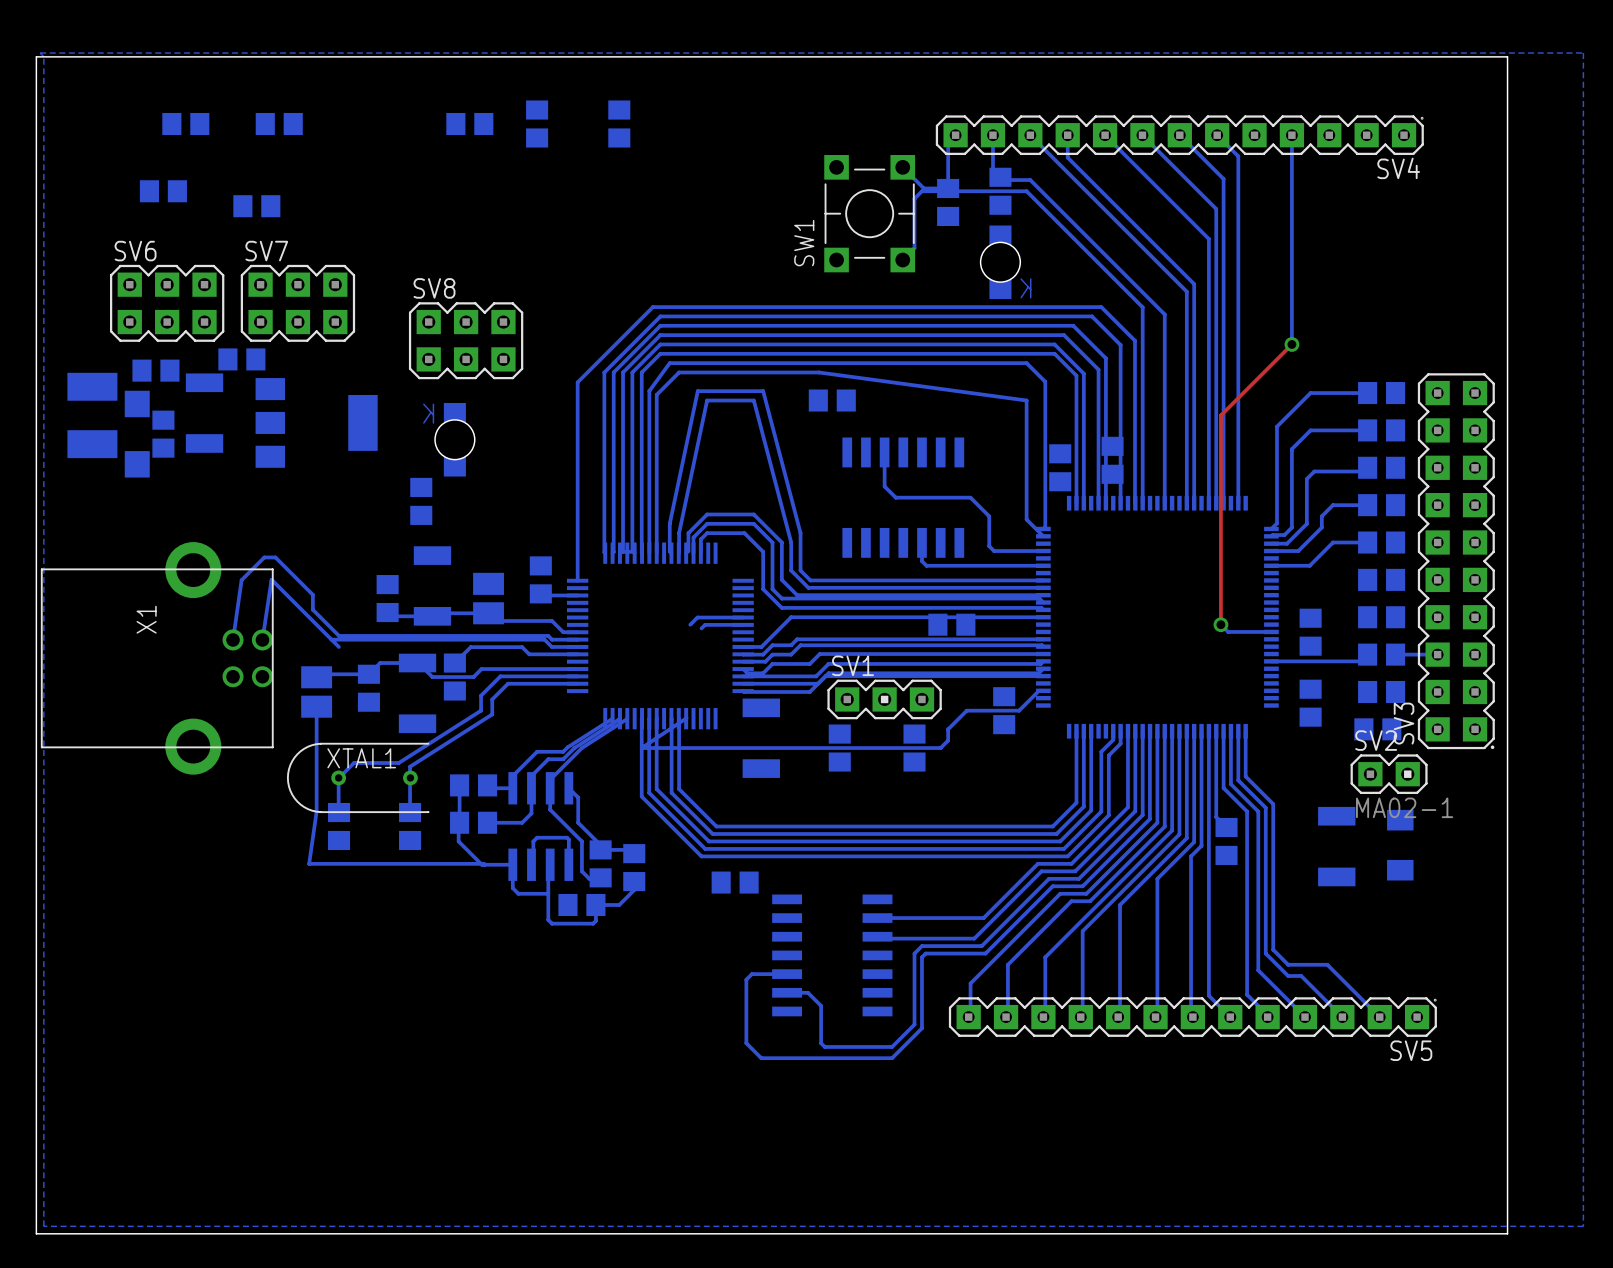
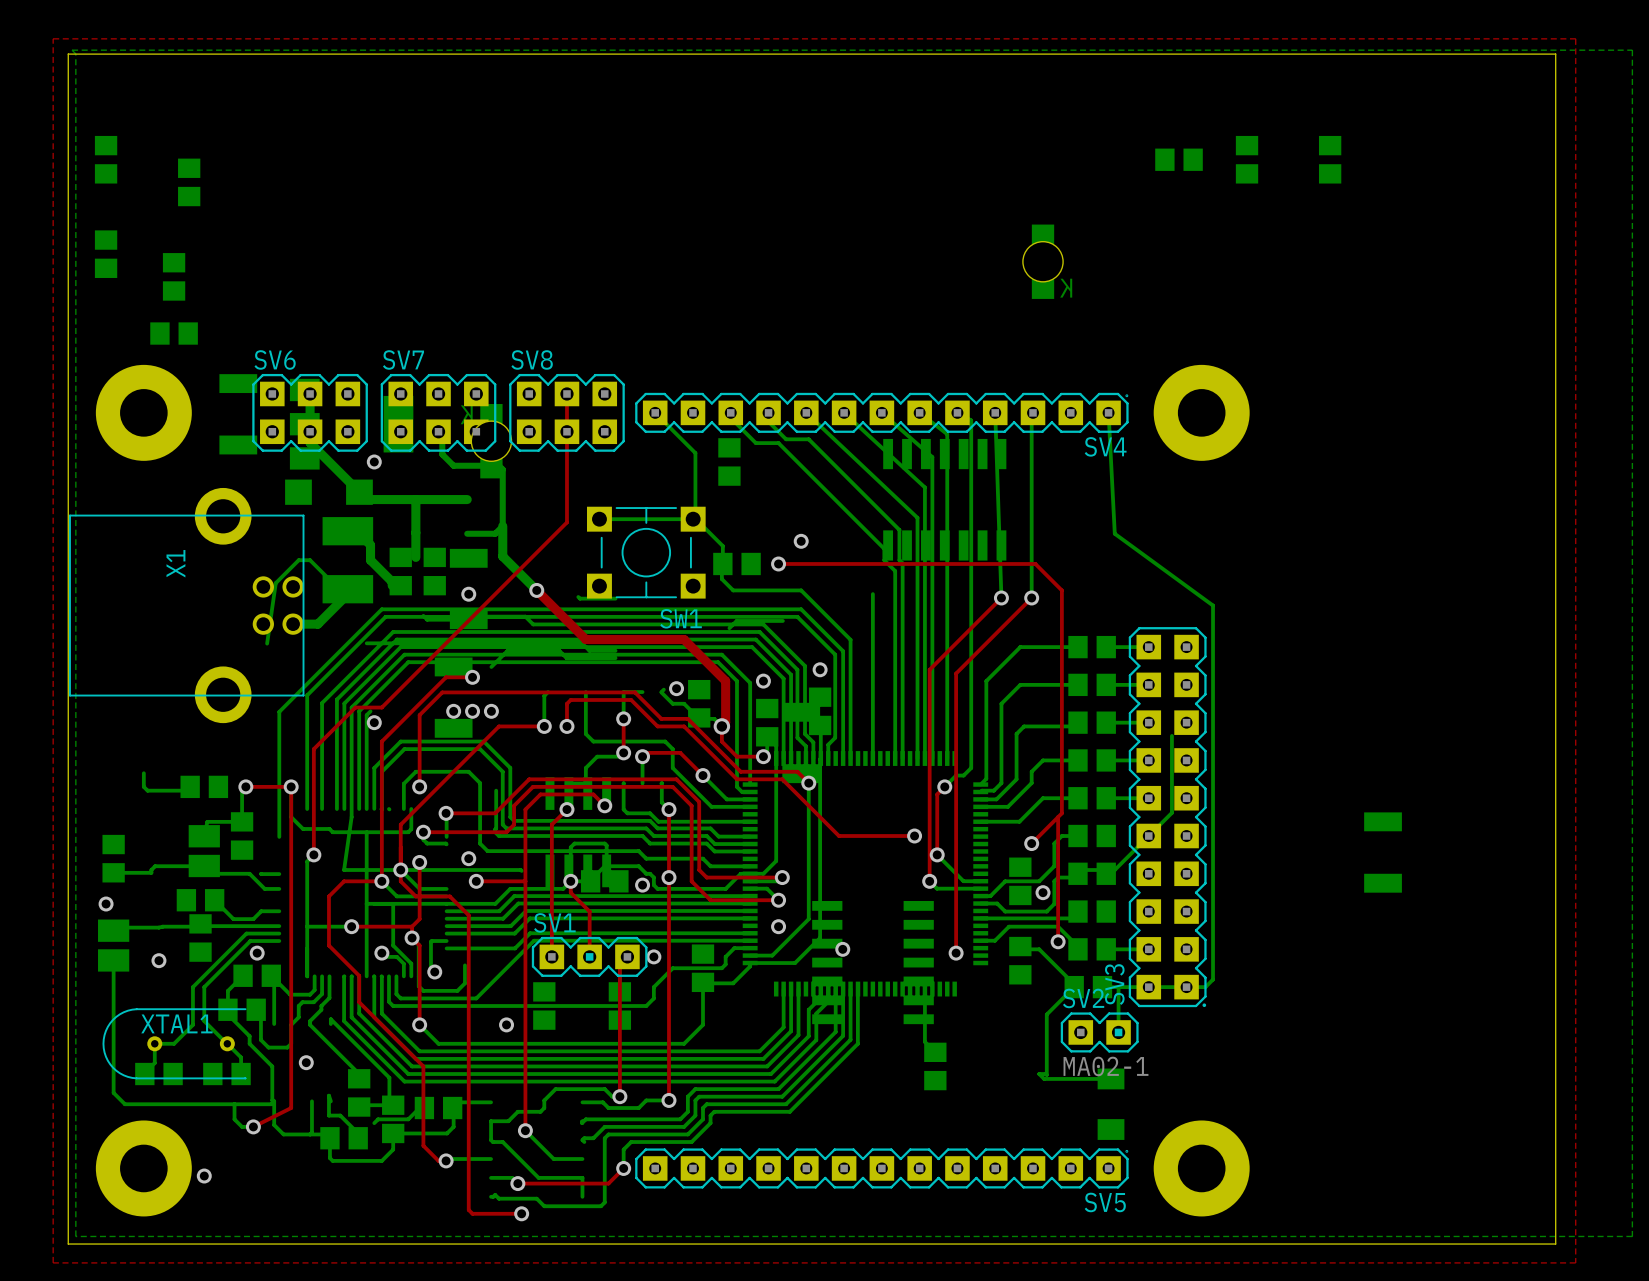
top zone outline: none -> (53, 38) (1575, 38) (1575, 1262) (53, 1262) (53, 38)
part: (185, 123) -> none
part: (279, 123) -> none
part: (469, 123) -> none
part: (537, 123) -> none
part: (619, 123) -> none
bottom track: (955, 135) (948, 142) (948, 188) -> none
bottom track: (992, 135) (992, 169) (1003, 180) (1030, 180) (1164, 314) (1164, 503) -> none
bottom track: (1030, 135) (1186, 291) (1186, 503) -> none
bottom track: (1067, 135) (1067, 157) (1194, 284) (1194, 503) -> none
bottom track: (1105, 135) (1208, 239) (1208, 503) -> none
bottom track: (1142, 135) (1216, 209) (1216, 503) -> none
bottom track: (1179, 135) (1223, 178) (1223, 503) -> none
SV4 position: (1179, 135) -> (881, 412)
bottom track: (1217, 135) (1238, 156) (1238, 503) -> none
bottom track: (1291, 135) (1291, 344) -> none
part: none -> (106, 159)
part: none -> (1179, 159)
part: none -> (1247, 159)
part: none -> (1330, 159)
bottom track: (902, 167) (923, 188) (948, 188) -> none
part rotation: 0° (163, 191) -> 90° clockwise (189, 182)
part: (1000, 191) -> none
part: (948, 202) -> none
part: (256, 206) -> none
SW1 rotation: 0° (869, 213) -> 90° clockwise (646, 552)
SW1 position: (869, 213) -> (646, 552)
SW1 name position: SW1 (804, 243) -> SW1 (681, 618)
part: none -> (106, 254)
bottom track: (902, 260) (914, 248) (914, 198) (921, 191) (1026, 191) (1142, 307) (1142, 503) -> none
part: none -> (174, 276)
SV6 position: (167, 303) -> (310, 412)
SV7 position: (297, 303) -> (438, 412)
SV8 position: (466, 340) -> (566, 412)
top track: (1291, 344) (1220, 415) (1220, 624) -> none
via: (1291, 344) -> none
part: (241, 359) -> none
part position: (155, 370) -> (174, 333)
bottom track: none -> (310, 393) (310, 442) (359, 492)
top track: none -> (566, 393) (566, 522) (381, 707) (355, 707) (313, 749) (313, 854)
bottom track: (1367, 393) (1310, 393) (1276, 426) (1276, 523) (1271, 528) -> none
part: (1381, 393) -> none
part: (832, 400) -> none
part: none -> (143, 412)
bottom track: none -> (730, 412) (730, 417) (755, 443) (778, 443) (884, 548) (884, 560) (895, 571) (895, 758)
bottom track: none -> (768, 412) (768, 421) (786, 439) (808, 439) (899, 529) (899, 560) (903, 563)
bottom track: none -> (806, 412) (917, 517) (917, 758)
bottom track: none -> (844, 412) (924, 487) (924, 758)
bottom track: none -> (881, 412) (932, 457) (932, 758)
bottom track: none -> (919, 412) (947, 434) (947, 758)
bottom track: none -> (957, 412) (971, 420) (971, 768) (963, 775) (956, 775) (944, 786)
bottom track: none -> (995, 412) (1001, 597)
bottom track: none -> (1108, 412) (1114, 533) (1213, 605) (1213, 979) (1205, 987) (1102, 987)
part: none -> (1201, 412)
part position: (92, 415) -> (347, 560)
bottom track: none -> (653, 420) (655, 412) (695, 453) (695, 518) (722, 546) (722, 563)
bottom track: none -> (438, 431) (442, 435) (442, 454) (453, 465) (498, 465) (502, 469) (502, 526)
bottom track: (1367, 430) (1310, 430) (1291, 449) (1291, 527) (1284, 535) (1271, 536) -> none
part: (1381, 430) -> none
part rotation: 0° (137, 434) -> 90° clockwise (328, 492)
part position: (137, 434) -> (328, 492)
part: (163, 434) -> none
bottom track: (884, 452) (884, 486) (895, 497) (970, 497) (989, 516) -> (1033, 412) (1031, 518)
via: none -> (374, 461)
part: none -> (729, 461)
part: (1112, 460) -> none
part: (1060, 467) -> none
bottom track: (1367, 467) (1363, 471) (1314, 471) (1306, 478) (1306, 523) (1287, 543) (1271, 543) -> none
part: (1381, 467) -> none
bottom track: none -> (359, 492) (367, 499) (415, 499) (415, 557)
bottom track: none -> (366, 499) (467, 499)
part: (421, 501) -> none
bottom track: (1076, 503) (1076, 375) (1054, 353) (660, 353) (641, 372) (642, 553) -> none
bottom track: (1083, 503) (1083, 373) (1054, 344) (660, 344) (632, 372) (632, 550) (634, 553) -> none
bottom track: (1098, 503) (1098, 369) (1063, 335) (660, 335) (623, 372) (623, 551) (632, 551) -> none
bottom track: (1105, 503) (1105, 358) (1073, 325) (660, 325) (613, 372) (612, 553) -> none
bottom track: (1120, 503) (1120, 345) (1092, 316) (660, 316) (604, 372) (605, 553) -> none
bottom track: (1135, 503) (1134, 340) (1101, 307) (652, 307) (577, 382) (577, 580) -> none
bottom track: (1367, 505) (1333, 505) (1321, 516) (1321, 527) (1298, 551) (1271, 551) -> none
part: (1381, 505) -> none
bottom track: none -> (599, 519) (693, 519)
bottom track: none -> (502, 526) (495, 533) (467, 533)
bottom track: none -> (502, 526) (502, 556) (536, 590)
bottom track: none -> (347, 531) (344, 537) (347, 533) (359, 533) (370, 545) (370, 560) (392, 581) (392, 585) (400, 585)
bottom track: (1043, 528) (1045, 527) (1045, 381) (1026, 363) (669, 363) (649, 391) (649, 553) -> none
bottom track: (1043, 536) (1026, 519) (1026, 400) (819, 372) (679, 372) (656, 394) (656, 553) -> none
via: none -> (801, 541)
bottom track: (921, 542) (921, 561) (926, 565) (1043, 565) -> none
bottom track: (1367, 542) (1333, 542) (1309, 565) (1271, 565) -> none
part: (1381, 542) -> none
bottom track: (989, 546) (994, 551) (1043, 551) -> (1031, 548) (1031, 597)
bottom track: (671, 553) (669, 551) (669, 523) (697, 391) (763, 391) (800, 533) (800, 570) (810, 580) (1043, 580) -> none
bottom track: (678, 553) (679, 533) (707, 400) (753, 400) (791, 542) (791, 570) (808, 587) (1043, 587) -> none
bottom track: (686, 553) (688, 550) (688, 533) (707, 514) (753, 514) (781, 542) (781, 579) (797, 595) (1043, 595) -> none
bottom track: (693, 553) (693, 537) (707, 523) (753, 523) (772, 542) (772, 589) (781, 598) (1039, 598) (1043, 602) -> none
bottom track: (700, 553) (700, 539) (707, 533) (744, 533) (763, 551) (763, 589) -> (721, 560) (721, 579) (733, 590) (801, 590) (803, 592)
bottom track: none -> (902, 563) (902, 758)
part: none -> (736, 563)
top track: none -> (778, 563) (1035, 563) (1061, 590) (1061, 813) (1031, 843)
via: none -> (778, 563)
SV3 position: (1456, 561) -> (1167, 817)
part: none -> (400, 571)
part: none -> (434, 571)
bottom track: (271, 579) (338, 646) -> none
bottom track: (271, 579) (262, 639) -> none
part: (540, 579) -> none
part: (1381, 579) -> none
bottom track: (305, 587) (312, 594) (312, 609) (339, 635) (361, 635) -> (340, 590) (351, 590) (317, 624) (293, 624)
top track: none -> (536, 590) (585, 639) (684, 639) (725, 681) (725, 722) (721, 726) (721, 741) (736, 756) (763, 756)
via: none -> (536, 590)
bottom track: none -> (872, 594) (872, 758)
via: none -> (468, 594)
top track: none -> (1001, 597) (929, 669) (929, 881)
via: none -> (1001, 597)
top track: none -> (1031, 597) (956, 673) (956, 953)
via: none -> (1031, 597)
part: (387, 598) -> none
part: (488, 598) -> none
bottom track: (781, 607) (1041, 607) (1043, 609) -> (821, 611) (850, 639) (850, 758)
bottom track: (1043, 617) (791, 617) (761, 646) (743, 646) -> none
part: (1157, 617) -> none
part: (1381, 617) -> none
bottom track: (552, 620) (563, 632) (577, 632) -> (589, 624) (763, 624) (804, 665) (804, 733) (813, 742) (813, 758)
bottom track: (743, 624) (705, 624) (701, 628) -> none
part: (951, 624) -> none
bottom track: (1220, 624) (1228, 631) (1271, 631) -> none
via: (1220, 624) -> none
part: (1310, 632) -> none
bottom track: none -> (396, 639) (336, 699) (336, 809)
bottom track: (548, 635) (552, 639) (577, 639) -> (585, 639) (755, 639) (791, 674) (791, 758)
part: (660, 635) -> none
bottom track: (1043, 639) (797, 639) (791, 645) (772, 645) (763, 654) (743, 654) -> none
bottom track: none -> (1077, 647) (1020, 647) (986, 681) (986, 778) (980, 784)
part: none -> (1092, 647)
bottom track: (1043, 646) (800, 645) (791, 654) (772, 654) (765, 661) (743, 661) -> none
bottom track: (1043, 654) (819, 654) (809, 663) (772, 663) (763, 673) (747, 673) (743, 669) -> none
bottom track: (1367, 654) (1360, 661) (1271, 661) -> none
part: (1381, 654) -> none
bottom track: (1395, 654) (1437, 654) -> (1106, 647) (1148, 647)
X1 position: (157, 658) -> (186, 605)
bottom track: (1043, 661) (1040, 663) (828, 663) (816, 676) (743, 676) -> none
bottom track: (417, 662) (432, 677) (473, 677) (481, 669) (577, 669) -> none
bottom track: (417, 663) (380, 663) (368, 674) (319, 674) (316, 677) -> none
via: none -> (820, 669)
bottom track: (1043, 668) (1038, 673) (828, 673) (809, 691) (743, 691) -> none
top track: none -> (472, 677) (446, 677) (381, 741) (381, 881) (344, 881) (328, 896) (328, 945) (359, 975) (359, 1002) (423, 1066) (423, 1145) (438, 1160) (446, 1160)
via: none -> (472, 677)
bottom track: (577, 676) (500, 676) (481, 695) (481, 710) (398, 762) (353, 762) (338, 777) (339, 812) -> none
bottom track: (825, 676) (1043, 676) -> none
part: (454, 677) -> none
via: none -> (763, 681)
bottom track: none -> (1077, 684) (1020, 684) (1001, 703) (1001, 783) (993, 790) (980, 791)
part: none -> (1092, 684)
bottom track: none -> (1106, 684) (1148, 684)
bottom track: (577, 683) (507, 683) (492, 699) (492, 714) (410, 766) (410, 812) -> none
bottom track: (743, 683) (818, 683) -> none
via: none -> (676, 688)
bottom track: none -> (663, 689) (661, 692)
bottom track: none -> (548, 692) (544, 695) (544, 726)
bottom track: none -> (585, 692) (585, 733) (593, 741) (665, 741) (672, 749) (672, 768) (711, 806) (750, 806)
bottom track: none -> (642, 692) (623, 692) (623, 718)
part: (368, 688) -> none
bottom track: none -> (661, 692) (672, 703) (684, 703) (698, 717) (714, 718) (721, 726)
bottom track: (1043, 690) (1039, 690) (1019, 710) (966, 710) (948, 729) (948, 740) (940, 748) (641, 748) (686, 718) -> none
part: (316, 691) -> none
part: (1381, 691) -> none
part: none -> (699, 703)
SV1 position: (884, 699) -> (589, 956)
part: (1310, 703) -> none
bottom track: none -> (351, 711) (351, 707) (404, 654) (721, 654) (750, 682) (750, 784)
bottom track: none -> (370, 711) (366, 715) (366, 809)
via: none -> (453, 711)
via: none -> (472, 711)
via: none -> (491, 711)
part: none -> (820, 711)
part: (1004, 710) -> none
top track: none -> (623, 718) (623, 752)
via: none -> (623, 718)
via: none -> (374, 722)
bottom track: (612, 718) (563, 751) -> (623, 752) (619, 756) (600, 756)
bottom track: (619, 718) (574, 748) (563, 759) (548, 759) (531, 776) (531, 813) (522, 822) -> (750, 844) (714, 844) (706, 836) (653, 836) (646, 828) (559, 828)
bottom track: (627, 718) (581, 748) (550, 779) (550, 809) (581, 841) (581, 871) (589, 878) (600, 877) -> none
bottom track: (642, 718) (641, 796) (701, 856) (1067, 856) (1108, 815) (1108, 755) (1120, 743) (1120, 731) -> none
bottom track: (649, 718) (649, 792) (705, 848) (1063, 848) (1101, 811) (1101, 751) (1113, 739) (1113, 731) -> none
bottom track: (656, 718) (656, 789) (708, 841) (1060, 841) (1091, 810) (1091, 731) -> none
bottom track: (671, 718) (671, 792) (712, 833) (1056, 833) (1083, 806) (1083, 731) -> none
bottom track: (678, 718) (679, 789) (716, 826) (1052, 826) (1076, 802) (1076, 731) -> none
part: none -> (767, 722)
bottom track: none -> (1077, 722) (1074, 726) (1024, 726) (1016, 733) (1016, 779) (996, 799) (980, 799)
part: none -> (1092, 722)
bottom track: none -> (1106, 722) (1148, 722)
bottom track: none -> (820, 725) (820, 938) (795, 963) (750, 963) (750, 966) (733, 983) (702, 982) (702, 1024) (684, 1043) (438, 1043) (419, 1024)
top track: none -> (544, 726) (498, 726) (400, 824) (400, 881) (415, 896) (449, 896) (468, 915) (468, 1210) (472, 1213) (521, 1213)
via: none -> (544, 726)
top track: none -> (566, 726) (566, 703) (570, 699) (631, 699) (657, 726) (684, 726) (736, 779) (782, 779) (838, 836) (914, 836)
via: none -> (566, 726)
via: none -> (721, 726)
part: (1377, 729) -> none
bottom track: (1135, 731) (1135, 811) (1075, 871) (1041, 871) (974, 938) (879, 938) (877, 936) -> none
bottom track: (1142, 731) (1142, 815) (1078, 878) (1049, 878) (981, 946) (921, 946) (914, 953) (914, 1024) (892, 1046) (824, 1046) (821, 1043) (821, 1005) (808, 992) (787, 992) -> none
bottom track: (1149, 731) (1149, 819) (1082, 886) (1052, 886) (985, 953) (925, 953) (921, 957) (921, 1028) (892, 1058) (761, 1058) (746, 1043) (746, 979) (751, 974) (787, 974) -> none
bottom track: (1157, 731) (1157, 822) (1086, 893) (1060, 893) (970, 983) (970, 1017) (966, 1017) -> none
bottom track: (1164, 731) (1164, 826) (1090, 901) (1071, 901) (1007, 964) (1007, 1015) (1006, 1017) -> none
bottom track: (1172, 731) (1172, 830) (1045, 957) (1045, 1015) (1043, 1017) -> none
bottom track: (1179, 731) (1179, 834) (1082, 931) (1082, 1015) (1080, 1017) -> none
bottom track: (1186, 731) (1186, 838) (1120, 904) (1120, 1017) -> none
bottom track: (1194, 731) (1194, 842) (1157, 878) (1157, 1015) (1155, 1017) -> none
bottom track: (1201, 731) (1201, 845) (1191, 856) (1191, 1015) (1192, 1017) -> none
bottom track: (1208, 731) (1208, 995) (1230, 1017) -> none
bottom track: (1216, 731) (1216, 817) (1226, 827) -> none
bottom track: (1223, 731) (1223, 788) (1247, 811) (1247, 994) (1269, 1017) -> none
bottom track: (1230, 731) (1230, 784) (1258, 811) (1258, 970) (1305, 1017) -> none
bottom track: (1238, 731) (1238, 780) (1265, 807) (1265, 953) (1288, 975) (1301, 975) (1342, 1017) -> none
bottom track: (1245, 731) (1245, 776) (1273, 804) (1273, 949) (1288, 964) (1327, 964) (1379, 1017) -> none
via: none -> (623, 752)
part: (839, 748) -> none
part: (914, 748) -> none
bottom track: (559, 751) (537, 751) (514, 774) (514, 786) (512, 788) (490, 788) (487, 785) -> (597, 756) (585, 768) (585, 783) (566, 783) (566, 809)
bottom track: none -> (642, 756) (642, 783)
top track: none -> (642, 756) (646, 752) (680, 752) (702, 775)
via: none -> (642, 756)
bottom track: none -> (763, 756) (767, 752) (767, 736) (776, 745) (776, 861) (763, 873) (740, 873) (725, 888) (657, 888) (653, 885) (653, 877) (650, 873) (646, 873) (638, 866) (604, 866) (589, 881)
via: none -> (763, 756)
bottom track: none -> (783, 758) (783, 678) (752, 647) (400, 647) (344, 703) (344, 809)
bottom track: none -> (805, 758) (805, 746) (797, 737) (797, 669) (759, 631) (393, 631) (322, 703) (322, 809)
bottom track: none -> (828, 758) (828, 744) (835, 737) (835, 654) (797, 616) (385, 616) (307, 695) (307, 809)
bottom track: none -> (843, 758) (843, 651) (801, 609) (381, 609) (279, 711) (279, 836)
bottom track: none -> (1077, 760) (1043, 760) (1031, 771) (1031, 783) (1007, 806) (980, 806)
part: none -> (1092, 760)
bottom track: none -> (1106, 760) (1148, 760)
bottom track: none -> (143, 773) (143, 786) (147, 790) (185, 790) (190, 786)
bottom track: none -> (702, 775) (726, 799) (750, 799)
via: none -> (702, 775)
SV2 position: (1389, 774) -> (1099, 1032)
XTAL1 position: (358, 777) -> (174, 1043)
bottom track: none -> (623, 783) (623, 809) (627, 813) (650, 813) (658, 821) (750, 821)
bottom track: none -> (808, 783) (808, 919) (772, 955) (750, 955)
top track: none -> (808, 783) (797, 771) (740, 771) (687, 718) (661, 718) (634, 692) (442, 692) (419, 715) (419, 786)
via: none -> (808, 783)
bottom track: none -> (661, 783) (661, 802) (668, 809)
part: none -> (204, 786)
bottom track: none -> (245, 786) (242, 790) (242, 821) (207, 821) (204, 836)
top track: none -> (245, 786) (291, 786) (291, 1108) (253, 1126)
via: none -> (245, 786)
bottom track: none -> (291, 786) (291, 817) (303, 828) (329, 828) (332, 832) (408, 832) (411, 829) (411, 809)
via: none -> (291, 786)
via: none -> (419, 786)
top track: none -> (944, 786) (937, 794) (937, 854)
via: none -> (944, 786)
part: (473, 785) -> none
bottom track: none -> (750, 791) (742, 791) (736, 786) (736, 681) (718, 662) (408, 662) (359, 711) (359, 808)
bottom track: (568, 788) (578, 797) (578, 822) (600, 845) (600, 849) (630, 849) (634, 853) -> none
bottom track: none -> (1077, 798) (1043, 798) (1019, 821) (980, 821)
part: none -> (1092, 798)
bottom track: none -> (1106, 798) (1148, 798)
top track: none -> (604, 805) (593, 794) (540, 794) (525, 809) (525, 1130)
via: none -> (604, 805)
bottom track: none -> (374, 808) (374, 768) (400, 741) (483, 741) (510, 768) (510, 817) (514, 820) (650, 820) (657, 828) (710, 828) (718, 836) (750, 836)
bottom track: none -> (381, 809) (381, 771) (404, 749) (480, 749) (502, 771) (502, 824) (506, 828) (524, 828)
bottom track: none -> (389, 809) (389, 809)
bottom track: none -> (403, 809) (403, 783) (415, 771) (468, 771) (480, 783) (480, 843) (487, 851) (638, 851) (646, 858) (702, 858) (710, 866) (750, 866)
top track: none -> (566, 809) (551, 824) (551, 956)
via: none -> (566, 809)
top track: none -> (668, 809) (668, 1100)
via: none -> (668, 809)
bottom track: none -> (446, 813) (446, 836)
top track: none -> (446, 813) (495, 813) (529, 779) (676, 779) (699, 802) (699, 870) (706, 877) (782, 877)
via: none -> (446, 813)
top track: none -> (1058, 817) (1058, 941)
part: (473, 822) -> none
bottom track: none -> (366, 832) (366, 976)
part: (339, 826) -> none
bottom track: none -> (423, 832) (423, 839) (427, 843) (446, 844)
top track: none -> (423, 832) (506, 832) (514, 824) (514, 805) (532, 786) (672, 786) (691, 805) (691, 881) (710, 900) (778, 900)
via: none -> (423, 832)
part: (410, 826) -> none
bottom track: (458, 826) (458, 841) (481, 864) (512, 864) (512, 888) (518, 893) (548, 893) -> (495, 832) (498, 836) (642, 836) (650, 843) (706, 843) (714, 851) (750, 851)
part: none -> (242, 836)
via: none -> (914, 836)
bottom track: none -> (1077, 836) (1061, 836) (1054, 843) (1054, 866) (1039, 881) (1005, 881) (990, 896) (980, 896)
part: none -> (1092, 836)
via: none -> (1031, 843)
part: (1226, 841) -> none
part: none -> (204, 851)
part: (1400, 845) -> none
bottom track: none -> (313, 854) (307, 861) (307, 976)
via: none -> (313, 854)
bottom track: none -> (937, 854) (963, 881) (980, 881)
via: none -> (937, 854)
part: none -> (113, 858)
via: none -> (468, 858)
top track: none -> (419, 862) (419, 919) (412, 926)
via: none -> (419, 862)
bottom track: none -> (200, 866) (208, 873) (249, 873) (264, 888) (279, 888)
bottom track: none -> (204, 866) (155, 866) (151, 872) (113, 872)
bottom track: none -> (400, 870) (419, 888) (446, 888)
via: none -> (400, 870)
part: (600, 863) -> none
bottom track: (550, 864) (548, 866) (548, 919) (552, 923) (593, 923) (595, 920) (595, 904) (619, 904) (634, 890) (634, 881) -> none
bottom track: none -> (260, 873) (279, 874)
part: (634, 867) -> none
part: none -> (865, 873)
part: none -> (1092, 873)
via: none -> (668, 877)
bottom track: none -> (782, 877) (778, 881) (750, 881)
via: none -> (782, 877)
bottom track: (1030, 871) (983, 918) (877, 918) -> (1073, 877) (1058, 877) (1054, 881) (1054, 904) (1046, 911) (1005, 911) (997, 903) (980, 903)
bottom track: none -> (381, 881) (396, 896) (446, 896)
via: none -> (381, 881)
top track: none -> (476, 881) (525, 881)
via: none -> (476, 881)
top track: none -> (570, 881) (570, 892) (589, 911) (589, 956)
via: none -> (570, 881)
bottom track: none -> (593, 881) (570, 881) (563, 888) (510, 888) (495, 903) (366, 903)
part: none -> (604, 881)
bottom track: none -> (929, 881) (936, 888) (980, 888)
via: none -> (929, 881)
part: none -> (1020, 881)
via: none -> (642, 885)
bottom track: none -> (750, 888) (766, 888) (778, 900)
part: (735, 882) -> none
via: none -> (1043, 892)
bottom track: none -> (750, 896) (514, 896) (499, 911) (446, 911)
part: none -> (200, 900)
bottom track: none -> (214, 900) (233, 919) (253, 919) (261, 911) (279, 911)
via: none -> (778, 900)
via: none -> (106, 904)
bottom track: none -> (374, 904) (393, 904) (393, 945) (411, 963) (411, 976)
bottom track: none -> (750, 903) (518, 903) (503, 918) (446, 918)
part: (581, 904) -> none
bottom track: none -> (750, 910) (526, 910) (510, 926) (446, 926)
bottom track: none -> (1077, 911) (1071, 918) (980, 918)
part: none -> (1092, 911)
bottom track: none -> (750, 918) (529, 918) (514, 933) (446, 933)
bottom track: none -> (196, 922) (200, 926) (112, 927)
bottom track: none -> (200, 923) (199, 926) (279, 926)
bottom track: none -> (307, 926) (351, 926)
top track: none -> (351, 926) (412, 926)
via: none -> (351, 926)
top track: none -> (412, 926) (412, 938) (419, 945) (419, 1024)
via: none -> (778, 926)
bottom track: none -> (279, 933) (246, 933) (192, 987) (192, 1024) (174, 1043) (154, 1043) (154, 1063) (143, 1074)
bottom track: none -> (750, 933) (530, 933) (514, 948) (446, 948)
part: none -> (200, 938)
bottom track: none -> (412, 938) (418, 944) (418, 986) (423, 990) (457, 990) (464, 983) (464, 965)
via: none -> (412, 938)
bottom track: none -> (750, 940) (534, 940) (476, 998) (400, 998) (396, 994) (396, 976)
bottom track: none -> (980, 940) (994, 940) (1009, 926) (1058, 926) (1077, 945) (1077, 949)
bottom track: none -> (279, 941) (250, 941) (204, 987) (204, 1021) (226, 1043)
bottom track: none -> (446, 941) (430, 941) (430, 975)
via: none -> (1058, 941)
part: none -> (113, 945)
bottom track: none -> (1020, 946) (1023, 949) (1039, 949) (1074, 984) (1074, 987) (1046, 1014) (1046, 1074) (1039, 1074) (1044, 1078) (1111, 1078)
bottom track: none -> (750, 948) (734, 948) (725, 956) (725, 964) (721, 968) (672, 968) (653, 987) (653, 998) (646, 1006) (393, 1006) (389, 1001) (389, 976)
via: none -> (842, 949)
part: none -> (1092, 949)
bottom track: none -> (1106, 949) (1148, 949)
via: none -> (257, 953)
bottom track: none -> (381, 953) (385, 956) (396, 956) (403, 963) (403, 976)
via: none -> (381, 953)
via: none -> (956, 953)
top track: none -> (627, 956) (619, 964) (619, 1096)
via: none -> (653, 956)
bottom track: none -> (113, 960) (113, 1092) (124, 1104) (271, 1104) (274, 1101)
via: none -> (158, 960)
part: none -> (1020, 960)
part: none -> (702, 968)
via: none -> (434, 972)
bottom track: none -> (243, 975) (227, 990) (227, 1014) (249, 1036) (249, 1043) (272, 1066) (272, 1100) (274, 1101)
part: none -> (257, 975)
bottom track: none -> (271, 975) (290, 994) (310, 994) (314, 990) (314, 976)
bottom track: none -> (322, 976) (322, 994) (313, 1002) (302, 1002) (298, 1006) (298, 1017) (291, 1024) (291, 1043) (287, 1047) (268, 1047) (260, 1040) (260, 1017) (253, 1009) (256, 1009) (249, 1014)
bottom track: none -> (329, 976) (329, 997) (310, 1021) (310, 1024) (359, 1074) (359, 1078)
bottom track: none -> (344, 976) (344, 1021) (404, 1081) (774, 1081) (816, 1040) (816, 1013) (828, 1001) (828, 989)
bottom track: none -> (351, 976) (351, 1017) (408, 1074) (770, 1074) (808, 1036) (808, 1009) (820, 997) (820, 989)
bottom track: none -> (359, 976) (359, 1013) (412, 1066) (767, 1066) (798, 1035) (798, 989)
bottom track: none -> (374, 976) (374, 1017) (415, 1058) (763, 1058) (791, 1031) (791, 989)
bottom track: none -> (381, 976) (381, 1013) (419, 1051) (759, 1051) (783, 1027) (783, 989)
bottom track: none -> (274, 978) (274, 1024)
part: none -> (1088, 987)
bottom track: none -> (1118, 987) (1118, 1032)
bottom track: none -> (835, 989) (835, 1031) (778, 1089) (695, 1089) (687, 1096) (687, 1111) (680, 1119) (585, 1119) (582, 1123) (582, 1121)
bottom track: none -> (843, 989) (843, 1035) (782, 1096) (699, 1096) (695, 1100) (695, 1115) (684, 1126) (604, 1126) (593, 1138) (584, 1138) (582, 1140) (584, 1142)
bottom track: none -> (850, 989) (850, 1039) (786, 1104) (706, 1104) (702, 1108) (702, 1119) (687, 1134) (608, 1134) (604, 1138) (604, 1202) (600, 1206) (544, 1206) (536, 1198) (498, 1198) (495, 1194) (491, 1196)
bottom track: none -> (857, 989) (857, 1043) (789, 1111) (714, 1111) (710, 1115) (710, 1123) (691, 1142) (631, 1142) (623, 1149) (623, 1168)
bottom track: none -> (924, 989) (924, 1041) (935, 1052)
part: none -> (544, 1006)
part: none -> (619, 1006)
part: none -> (242, 1009)
bottom track: none -> (330, 1024) (330, 1019) (389, 1077) (389, 1101) (393, 1105) (361, 1105) (359, 1107)
via: none -> (419, 1024)
via: none -> (506, 1024)
SV5 position: (1192, 1017) -> (881, 1168)
bottom track: none -> (227, 1043) (241, 1057) (241, 1074)
via: none -> (306, 1062)
part: none -> (935, 1066)
part: none -> (158, 1074)
part: none -> (226, 1074)
part: none -> (359, 1092)
bottom track: none -> (619, 1096) (612, 1096) (604, 1089) (555, 1089) (544, 1100) (544, 1108) (540, 1111) (517, 1111) (508, 1121) (491, 1121) (491, 1140) (492, 1142) (502, 1142) (538, 1177) (582, 1177) (582, 1196)
via: none -> (619, 1096)
bottom track: none -> (668, 1100) (646, 1100) (638, 1108) (608, 1108) (602, 1102) (582, 1102)
via: none -> (668, 1100)
bottom track: none -> (274, 1101) (274, 1125) (283, 1134) (332, 1134)
bottom track: none -> (311, 1101) (311, 1132) (310, 1134)
bottom track: none -> (330, 1101) (328, 1095) (328, 1115) (340, 1115) (358, 1133) (358, 1138)
bottom track: none -> (491, 1102) (459, 1102) (453, 1108)
bottom track: none -> (234, 1104) (234, 1119) (242, 1126) (253, 1126)
part: none -> (1111, 1104)
bottom track: none -> (424, 1108) (419, 1108) (408, 1119) (378, 1119) (374, 1123)
part: none -> (438, 1108)
bottom track: none -> (453, 1108) (453, 1126) (447, 1133) (393, 1133) (393, 1149) (381, 1160) (332, 1160) (329, 1158) (328, 1134)
part: none -> (393, 1119)
via: none -> (253, 1126)
bottom track: none -> (525, 1130) (553, 1159) (582, 1159)
via: none -> (525, 1130)
part: none -> (344, 1138)
bottom track: none -> (491, 1159) (447, 1159) (446, 1160)
via: none -> (446, 1160)
part: none -> (143, 1168)
top track: none -> (623, 1168) (608, 1183) (517, 1183)
via: none -> (623, 1168)
part: none -> (1201, 1168)
via: none -> (204, 1176)
bottom track: none -> (491, 1177) (512, 1177) (517, 1183)
via: none -> (517, 1183)
via: none -> (521, 1213)

